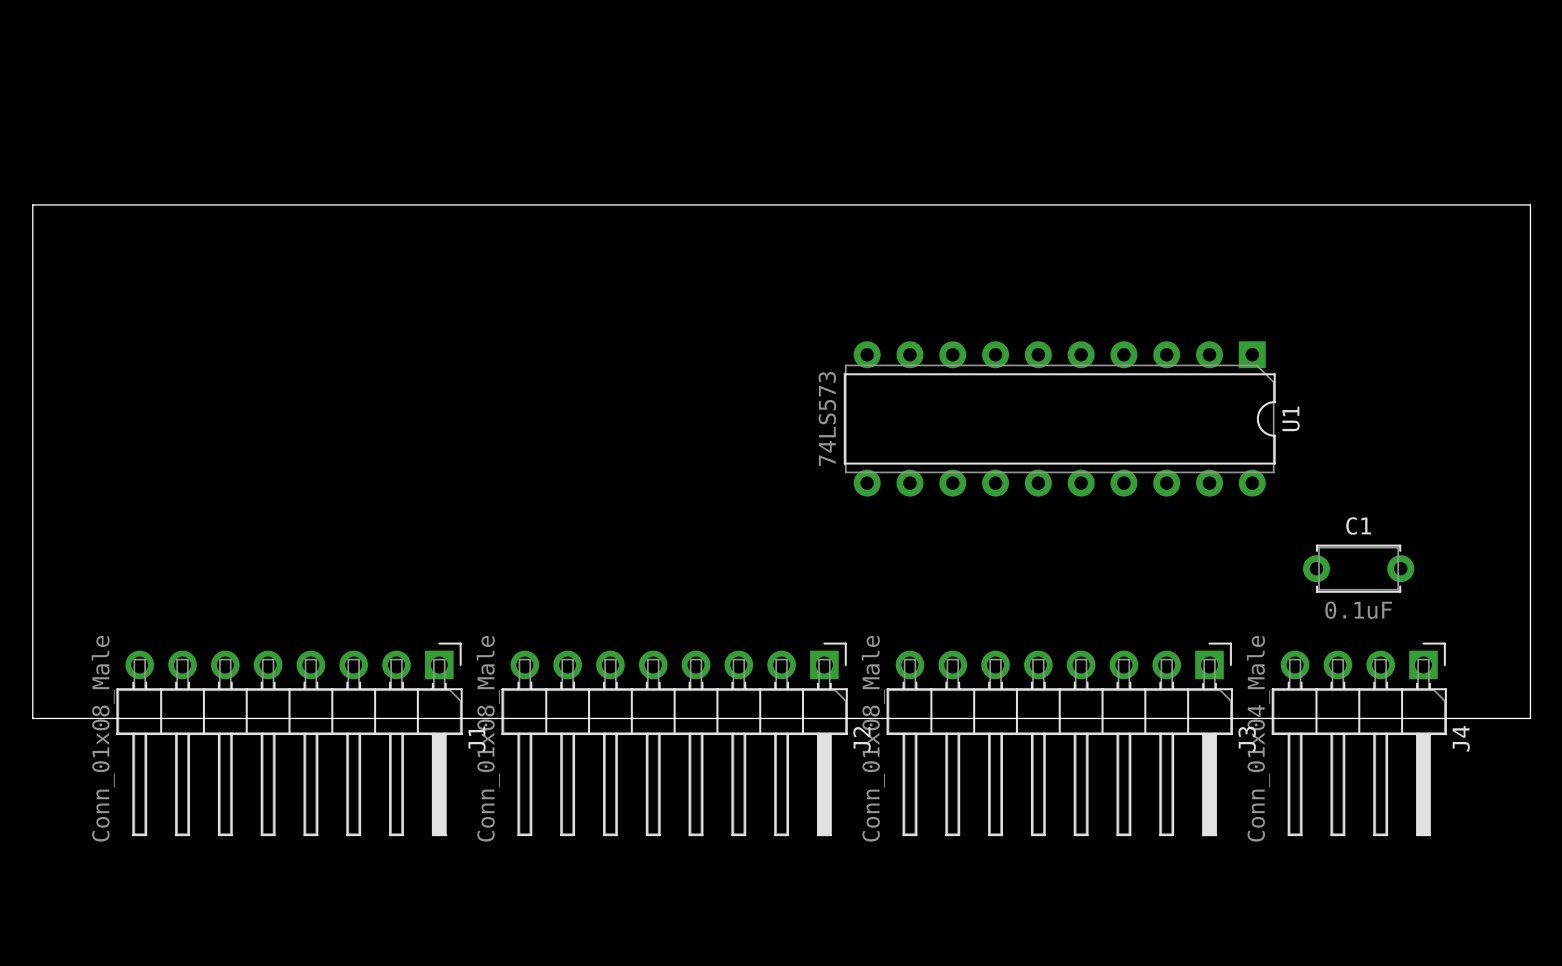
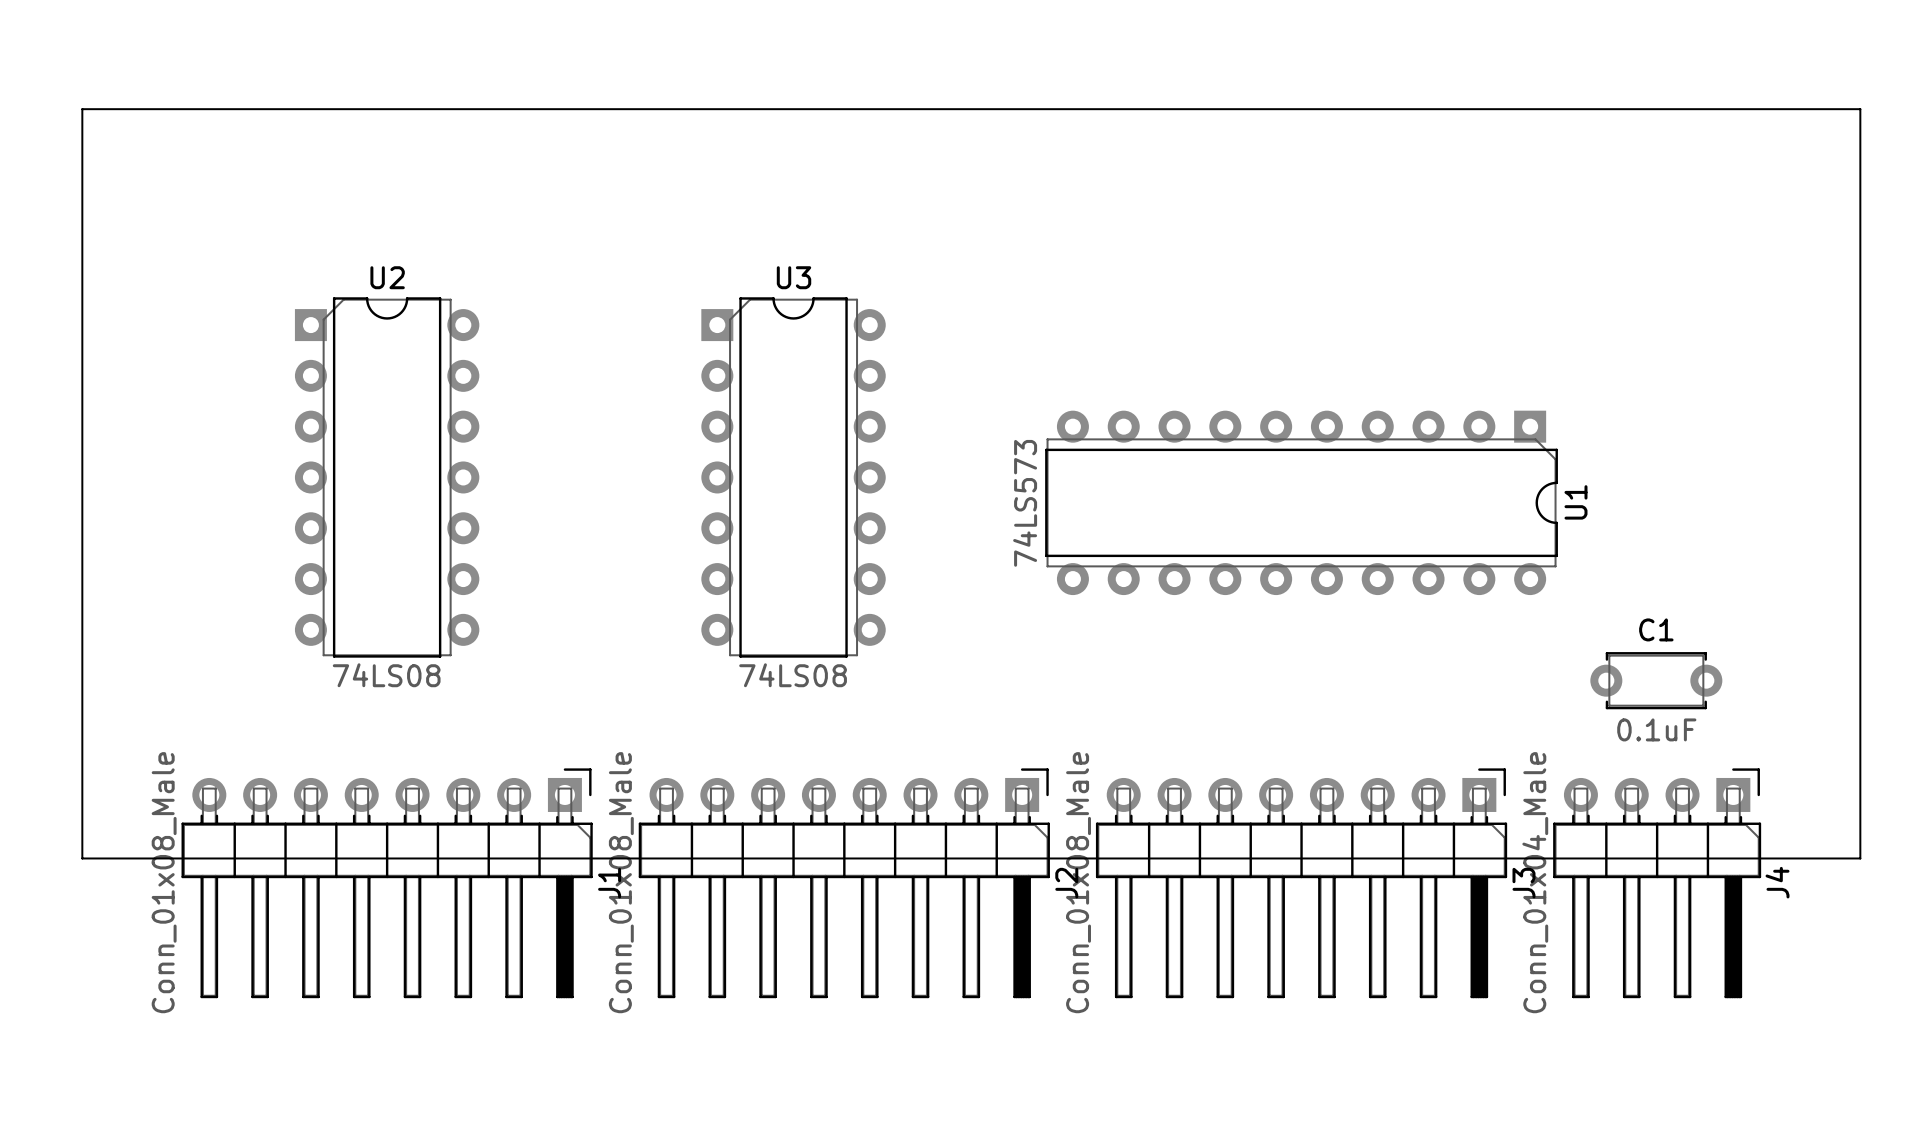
board edge: (32, 204) (1530, 204) -> (82, 248) (82, 109) (1860, 109) (1860, 248)
U2: none -> 74LS08 (387, 477)
U3: none -> 74LS08 (793, 477)

